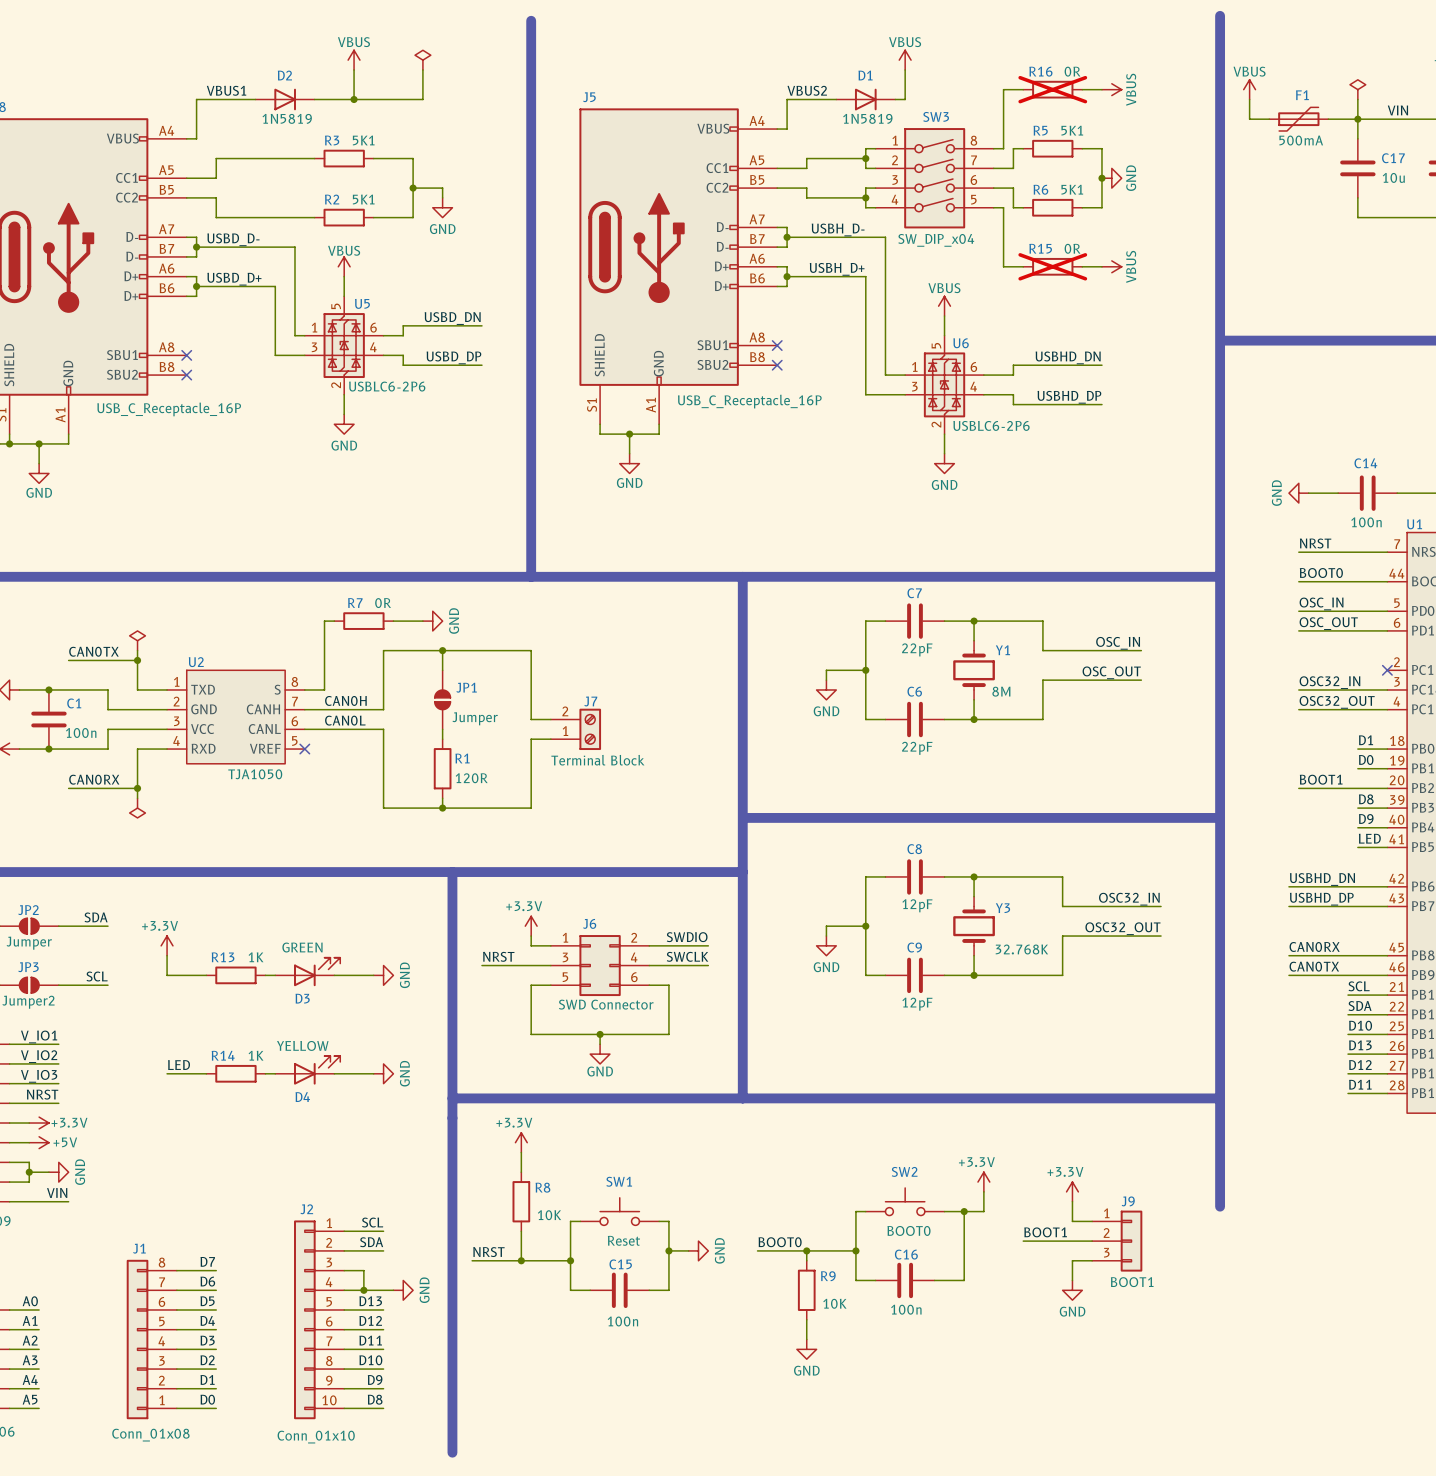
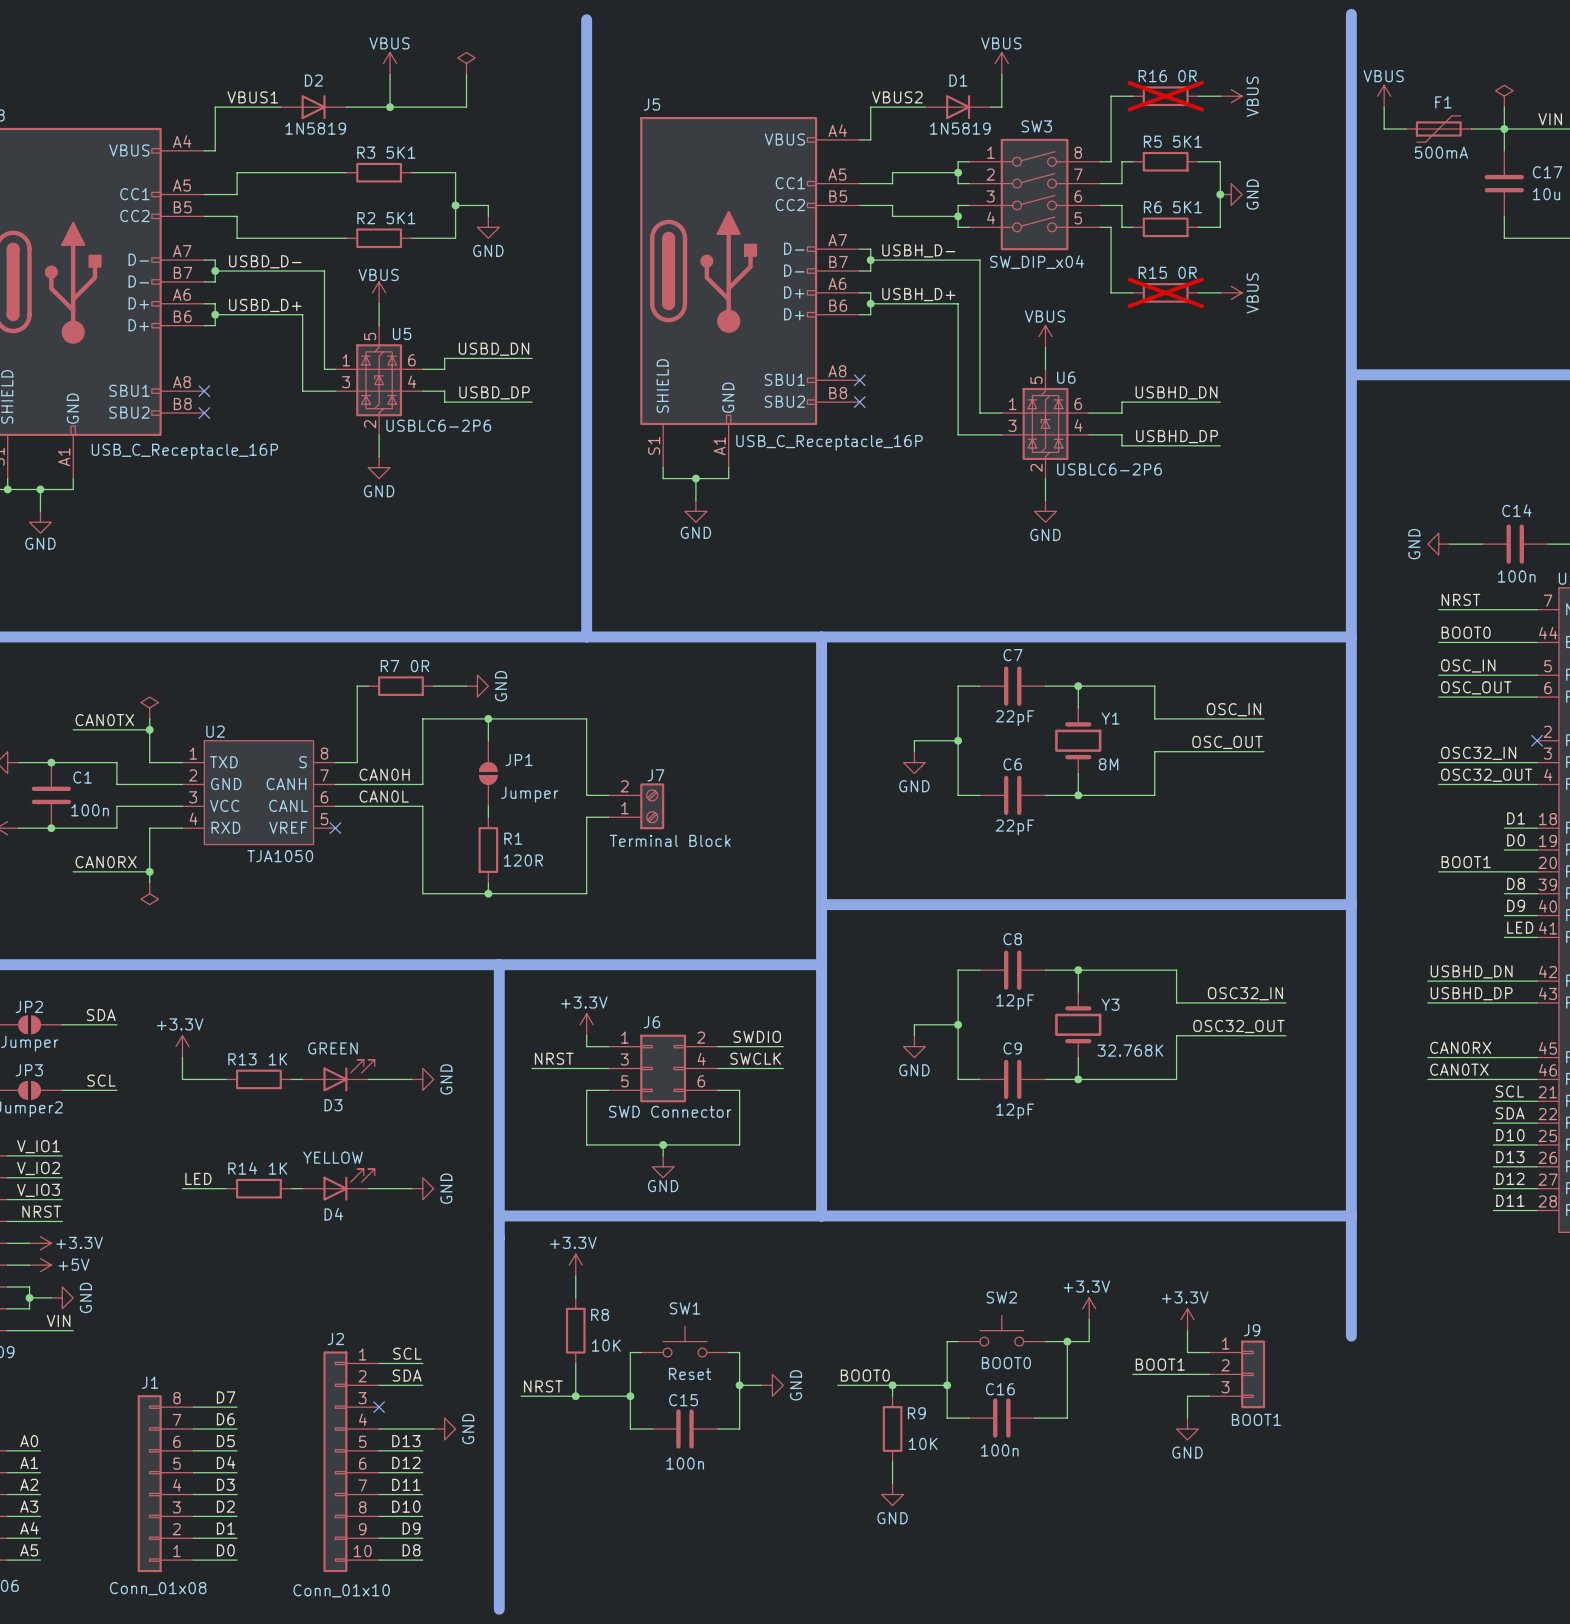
wire: (344, 1270) (363, 1270) (363, 1290) -> none
no-connect mark: none -> (379, 1407)
junction: (363, 1290) -> none

